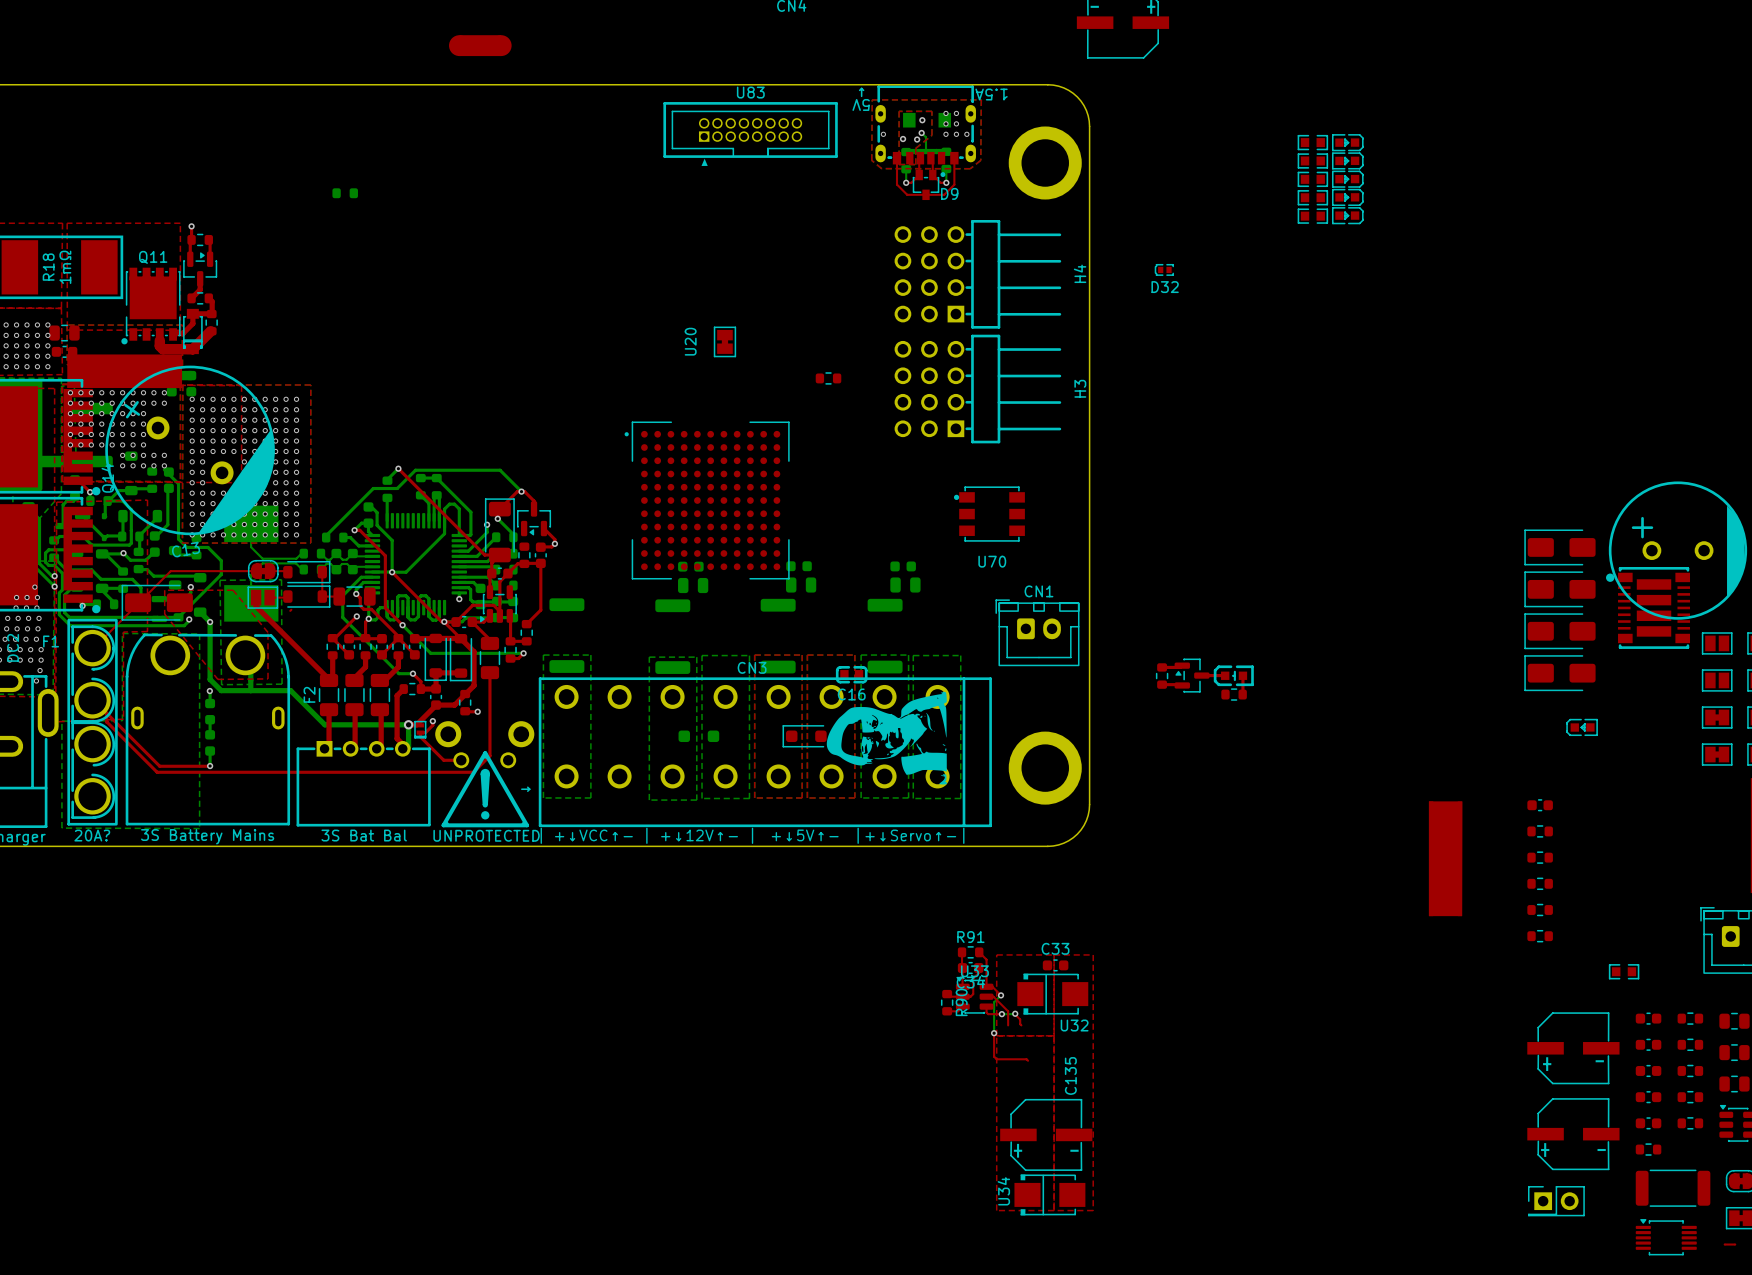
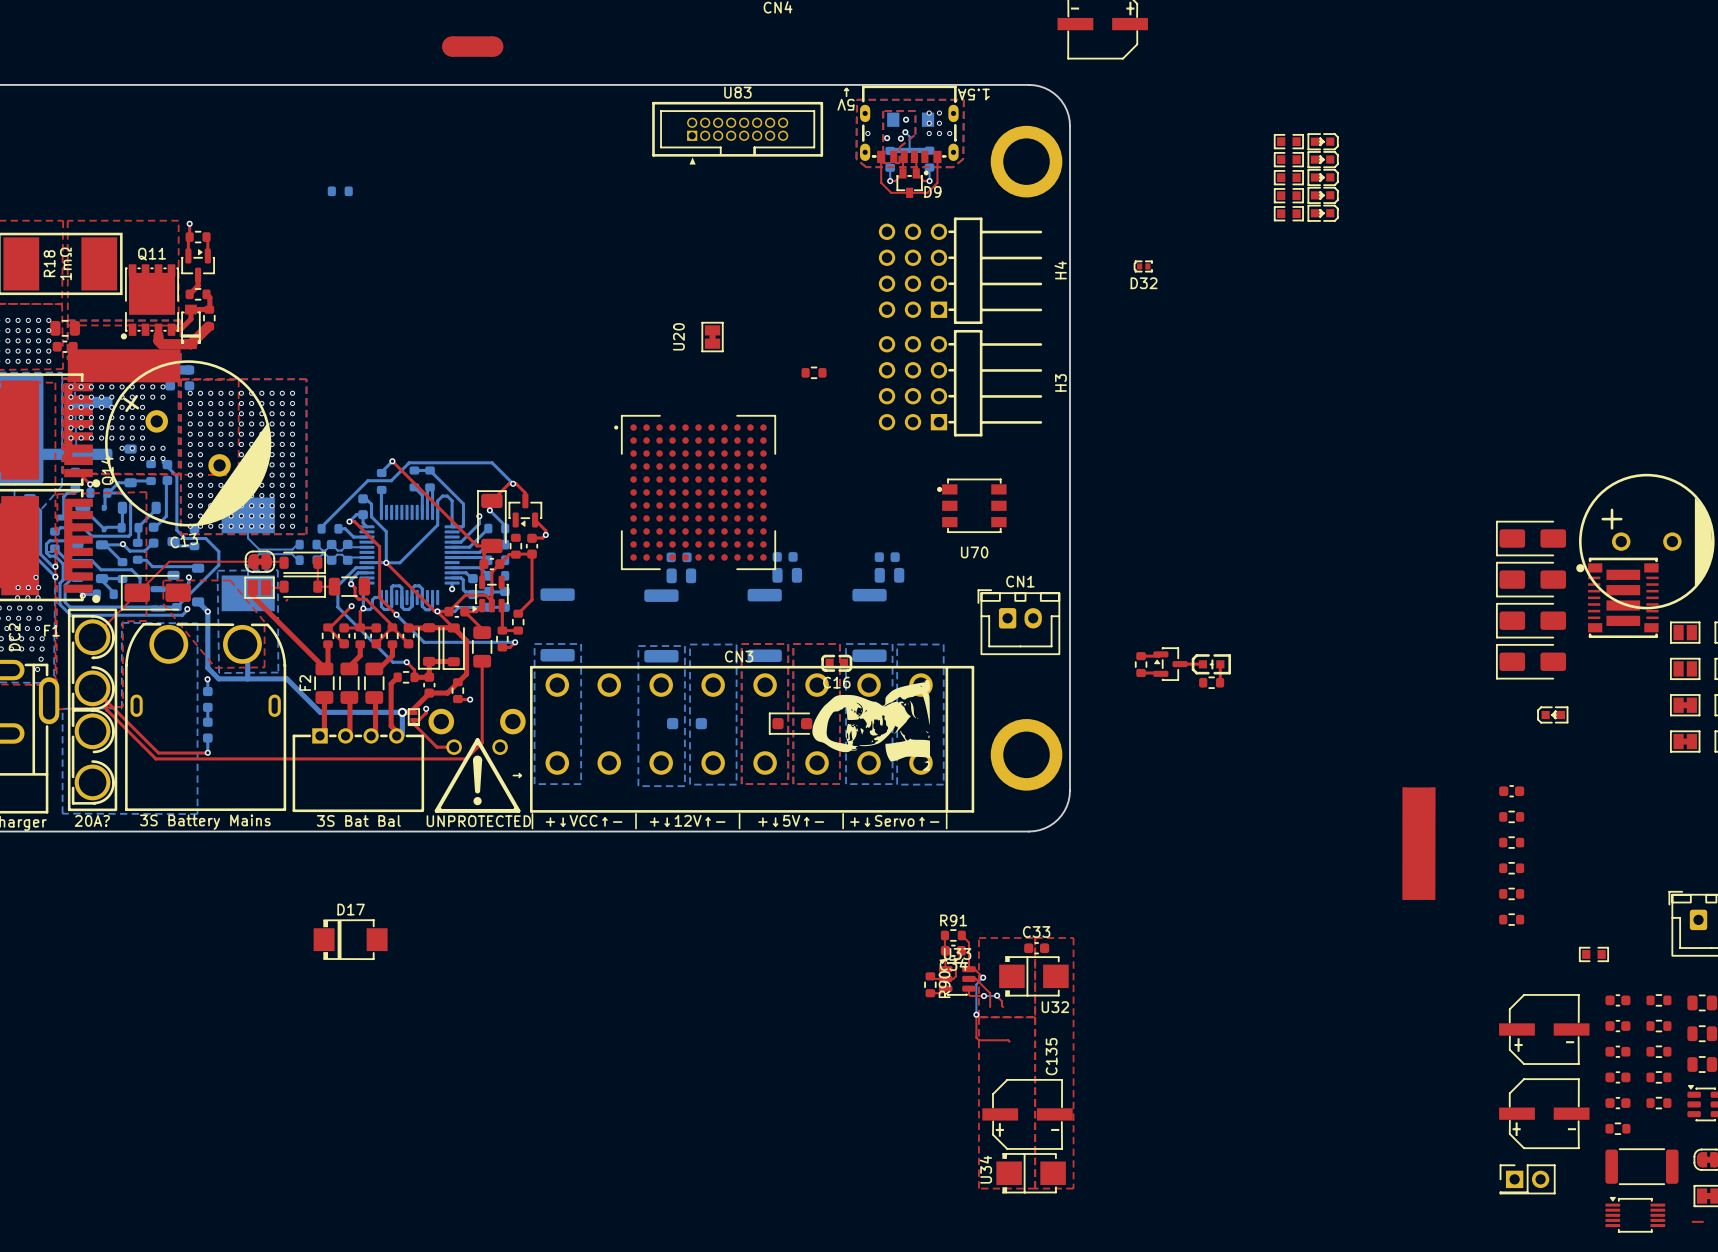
D17: none -> (350, 939)

